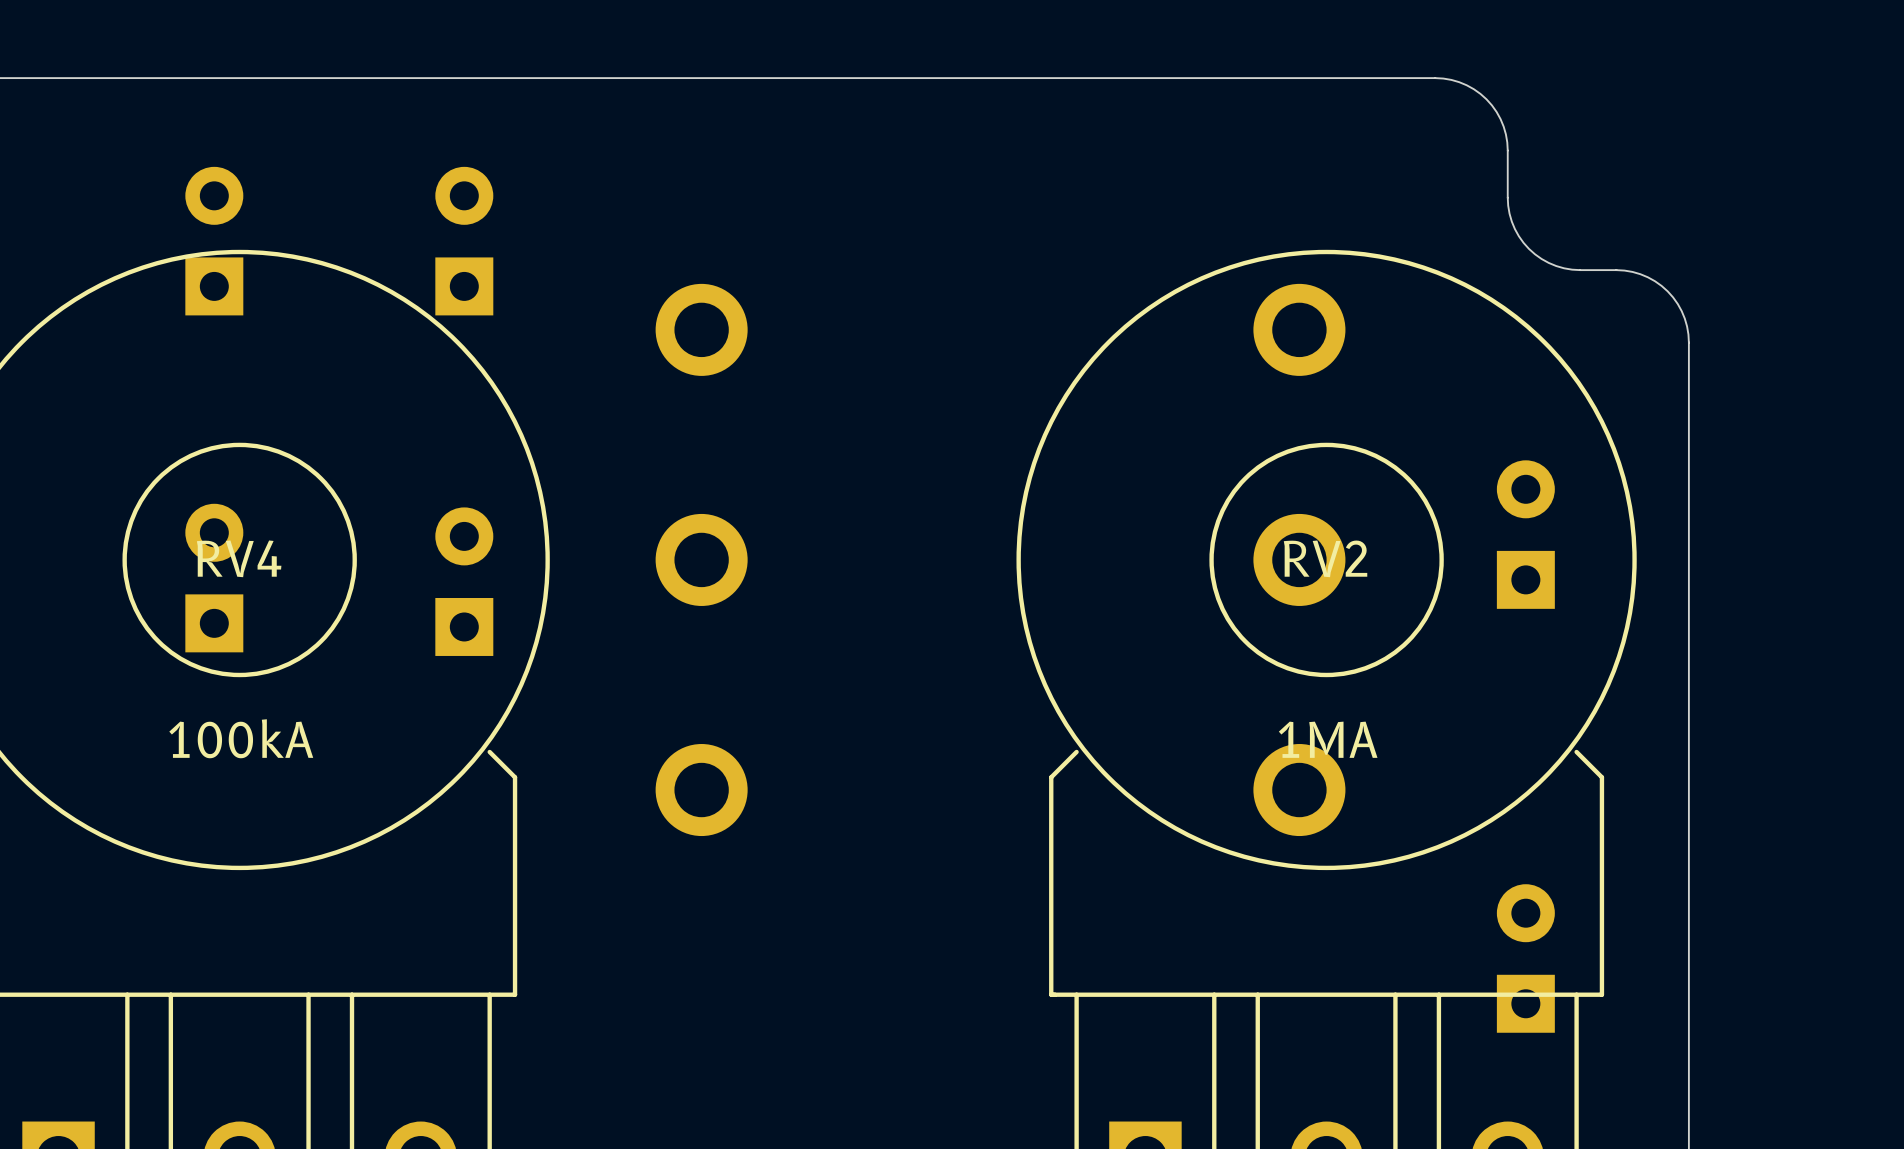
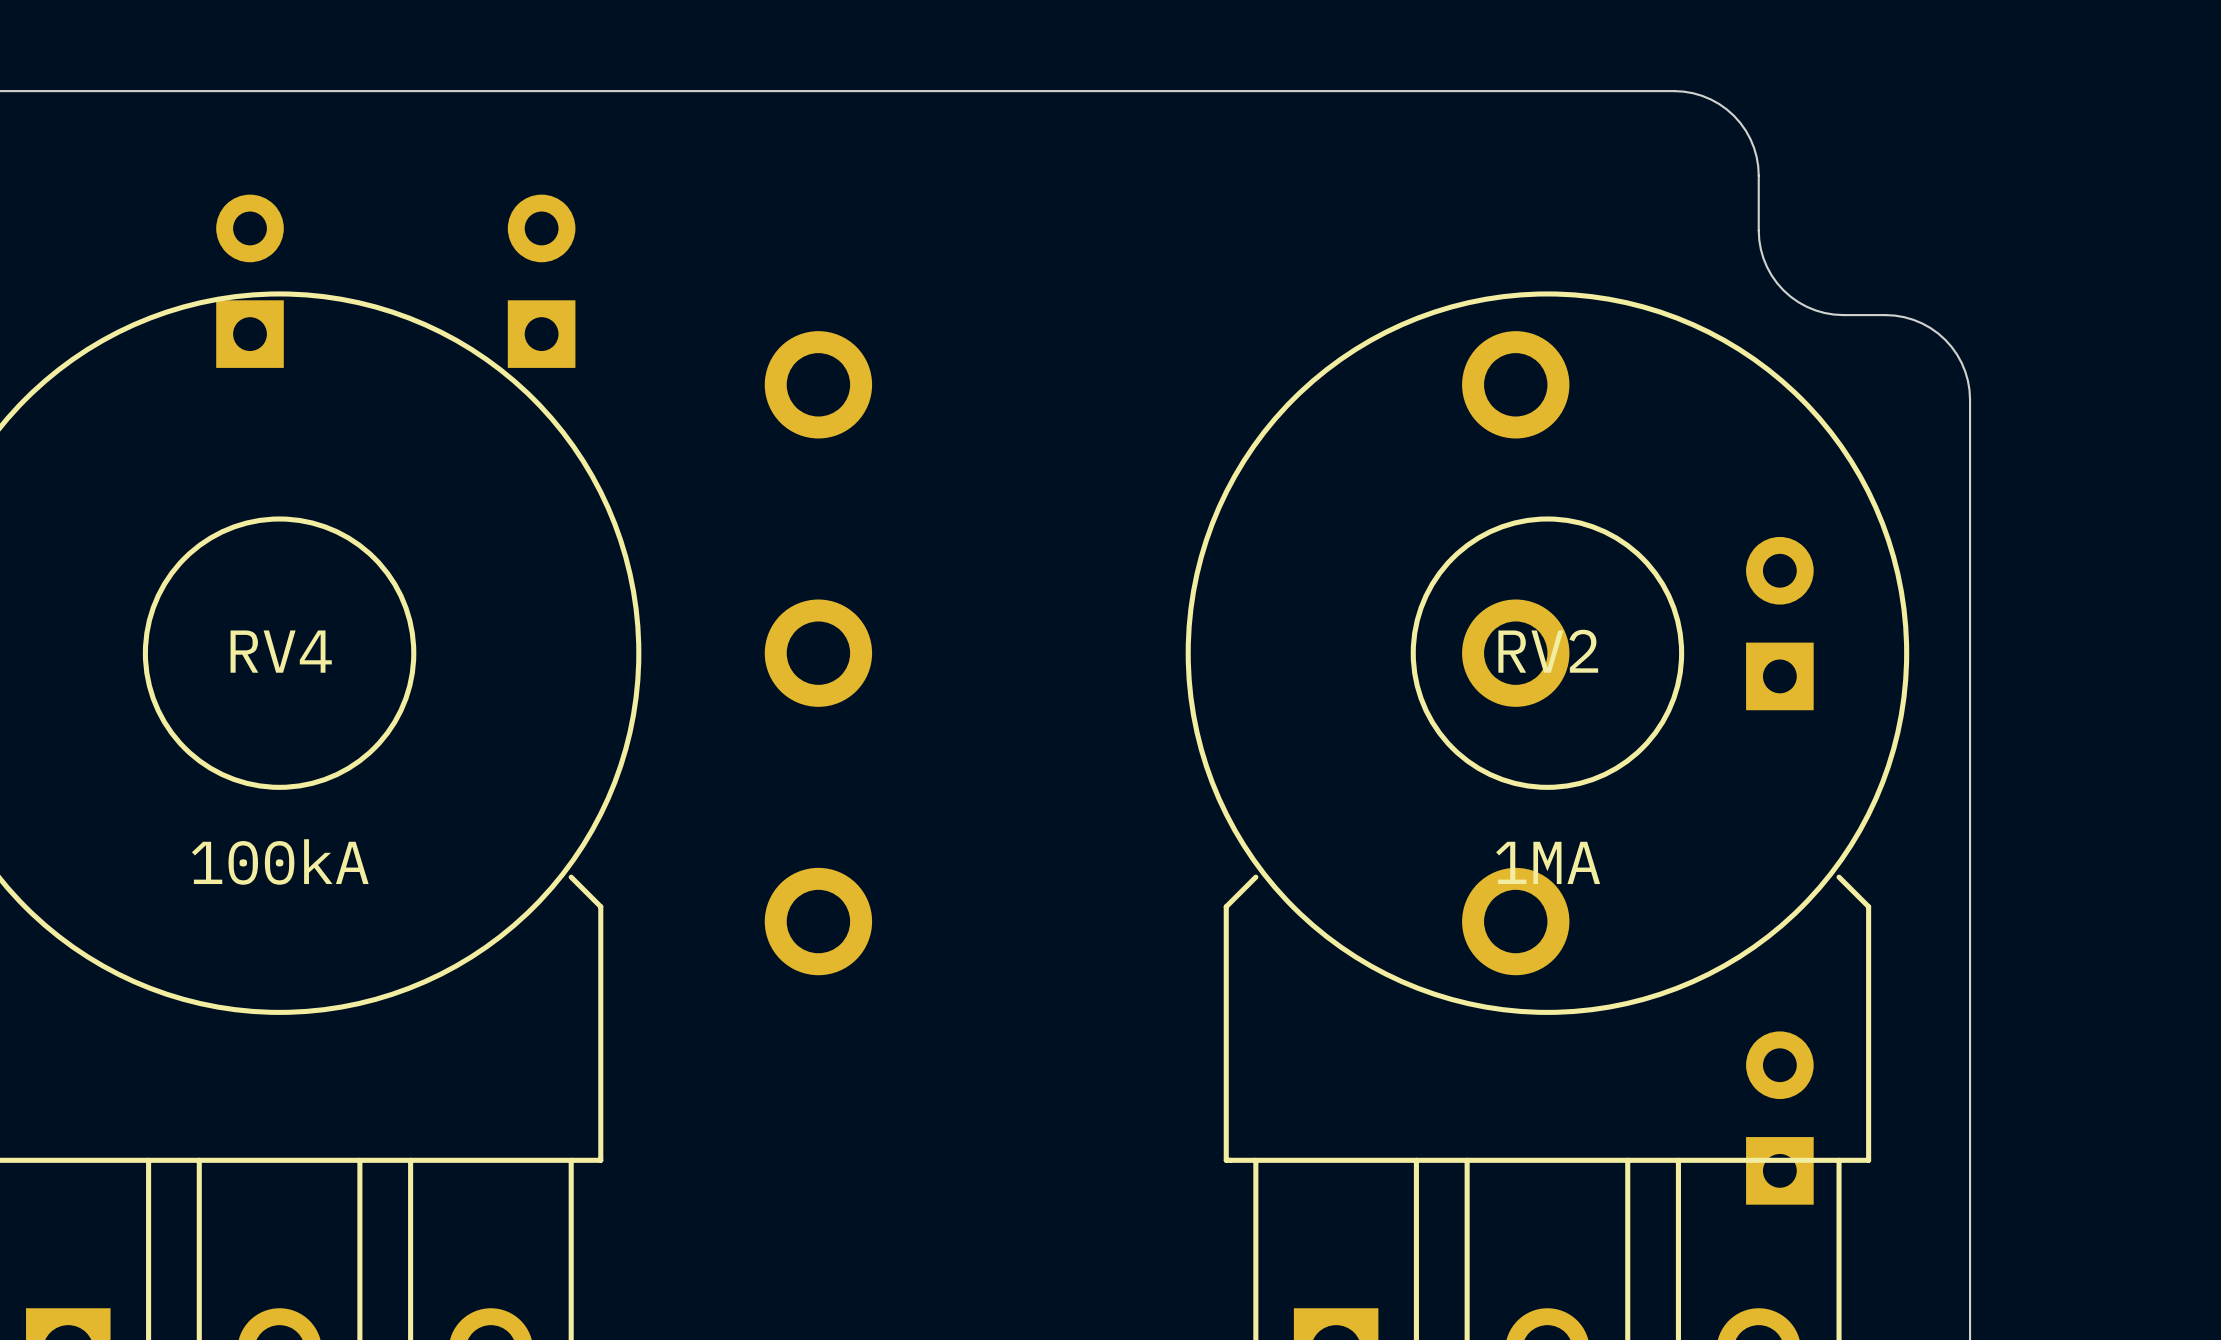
part: (214, 578) -> none
part: (464, 581) -> none

